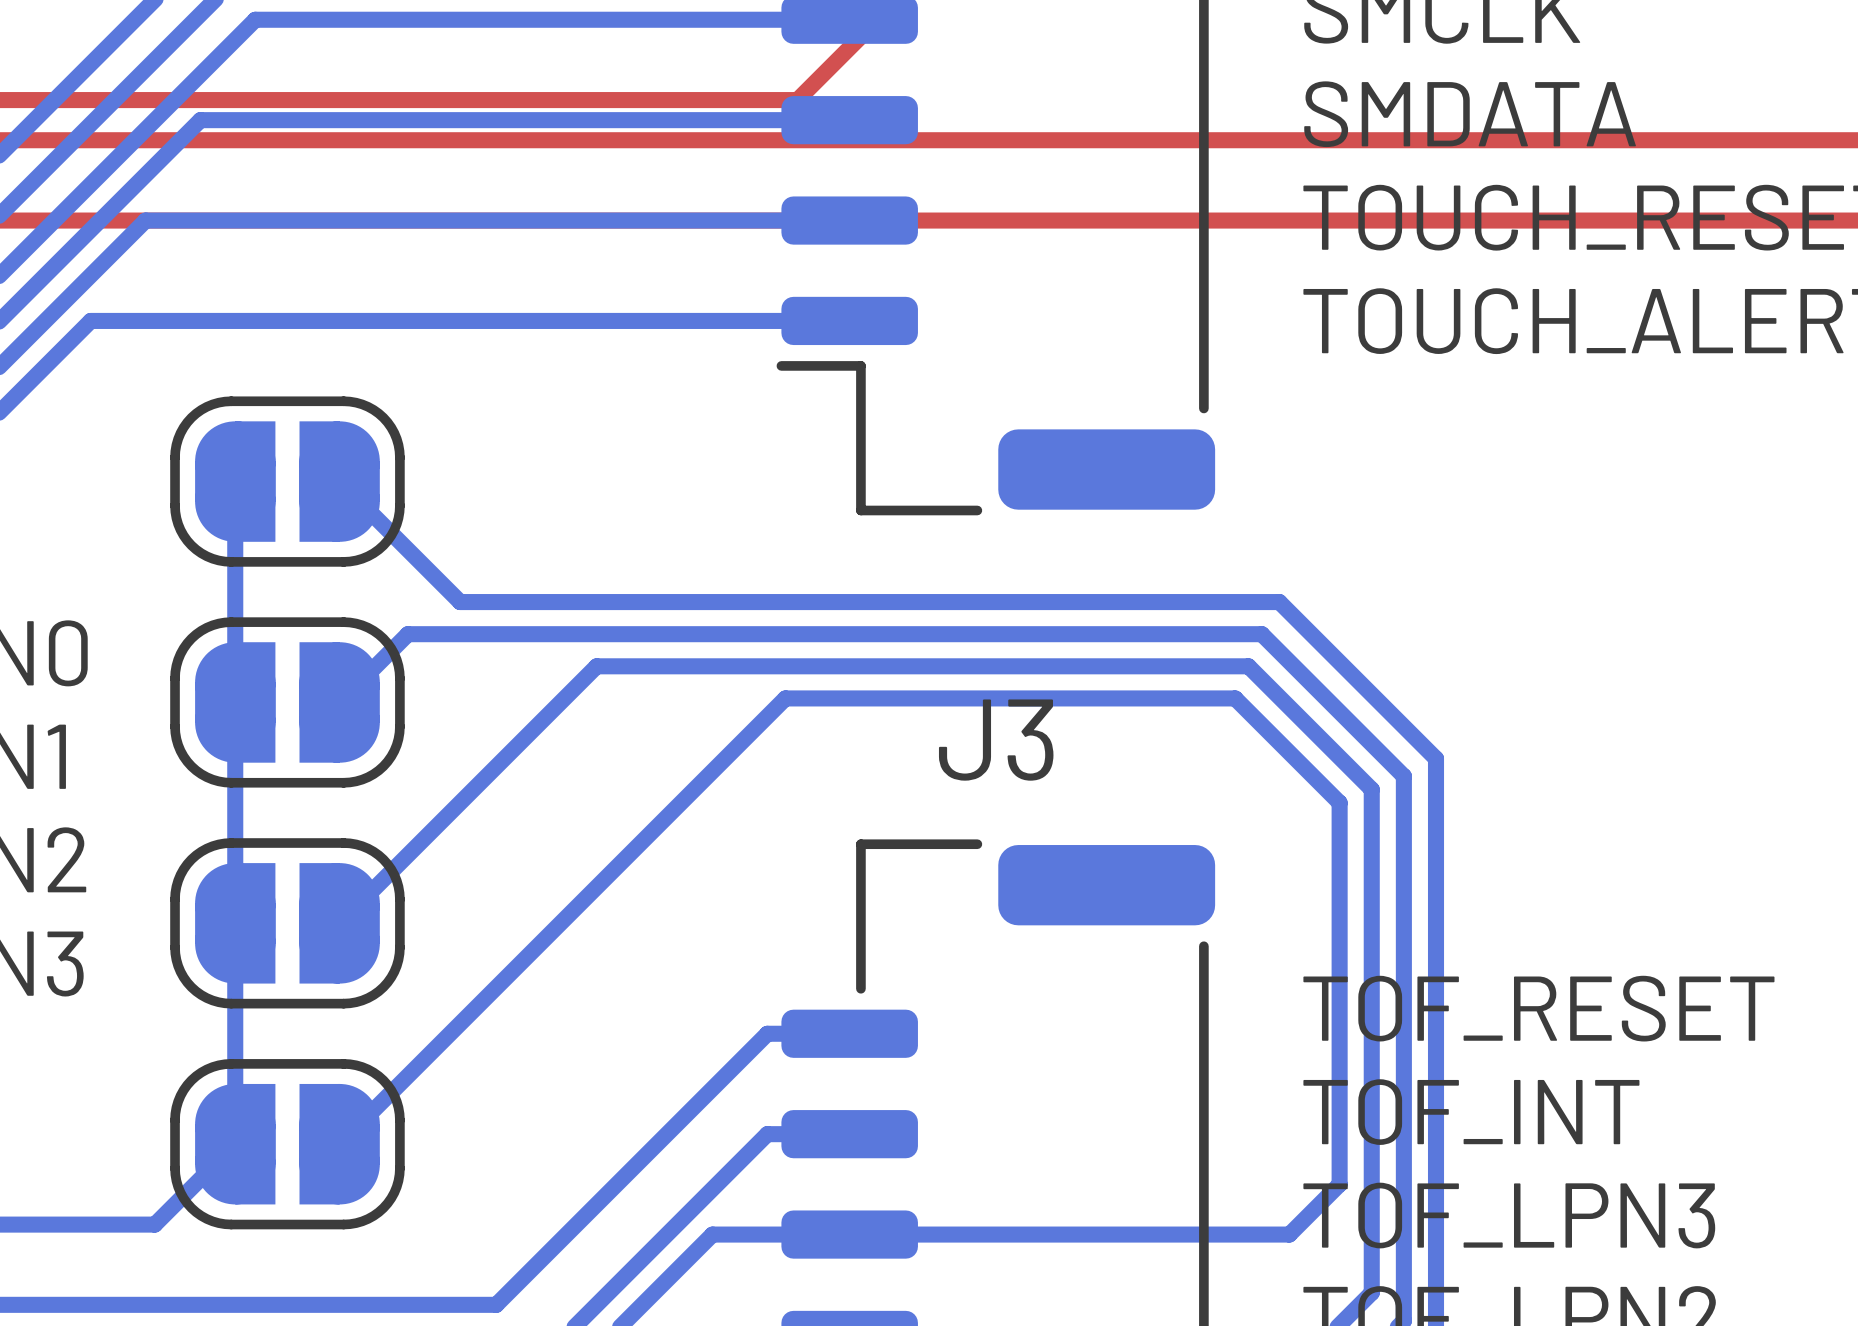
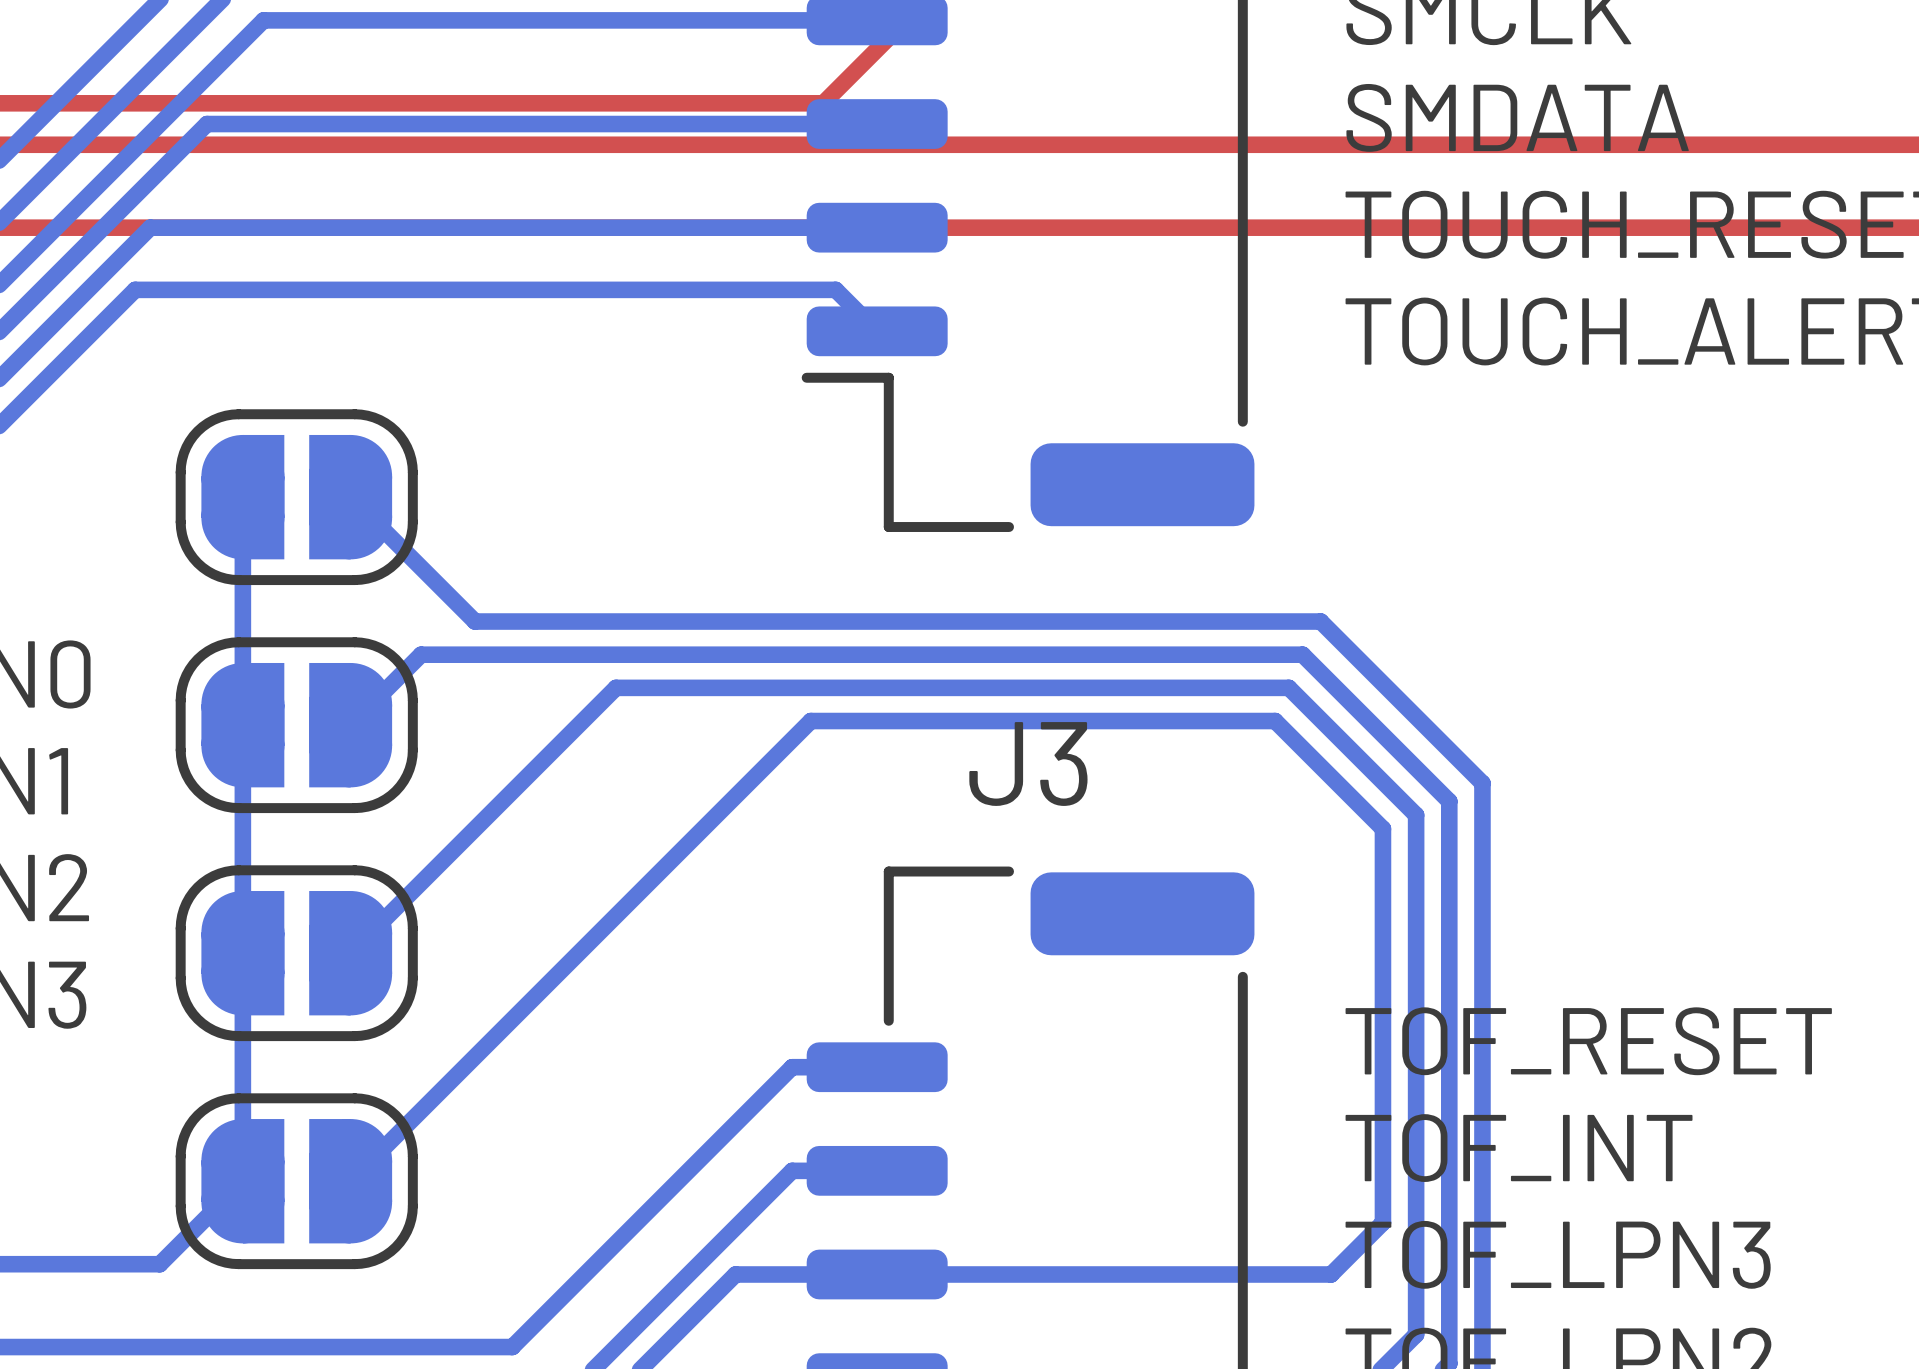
bottom track: (849, 320) (90, 320) -> (877, 331) (835, 289) (135, 289) (93, 331)

